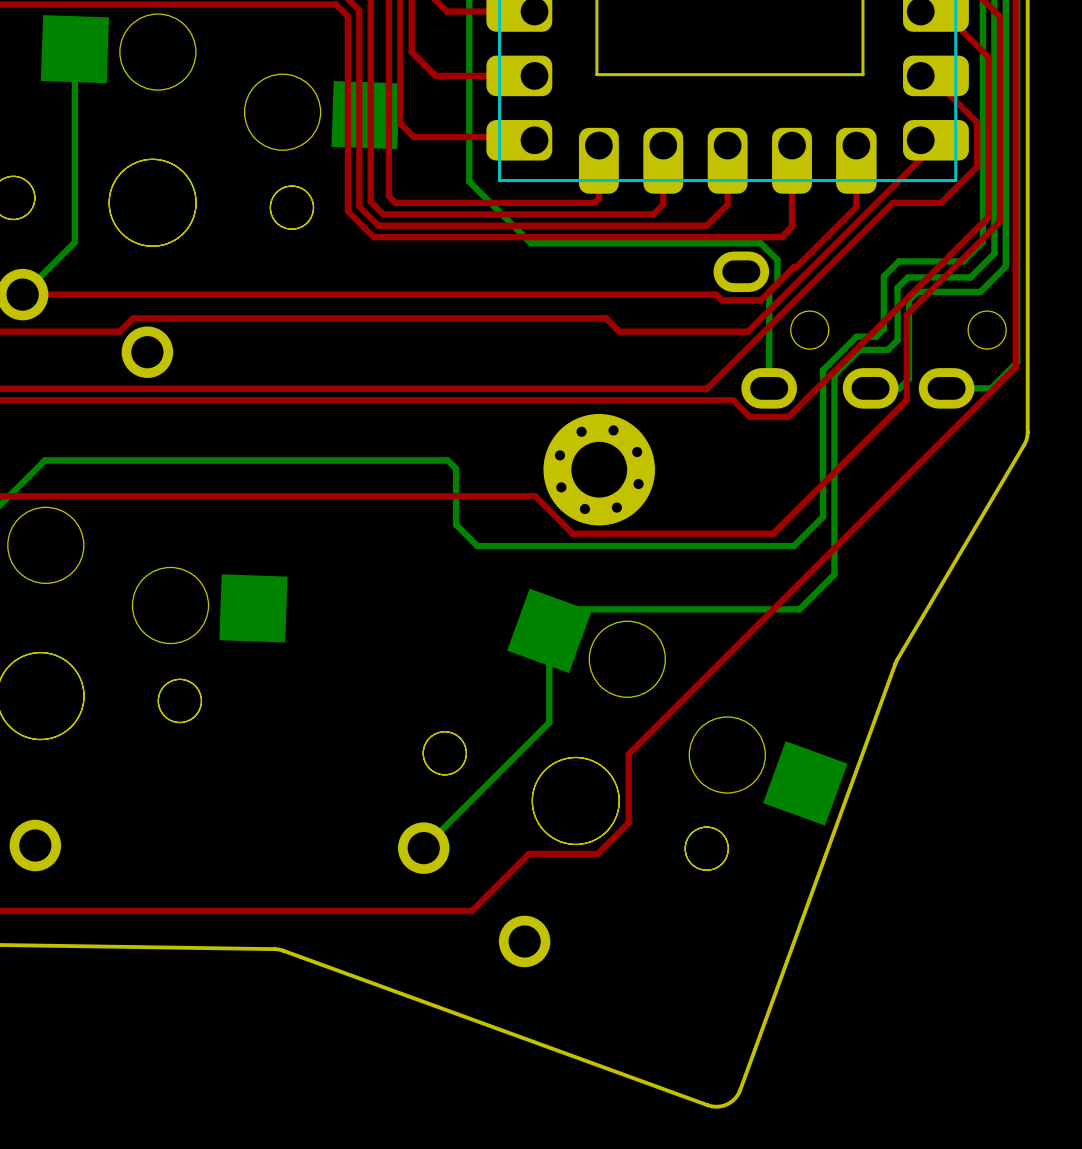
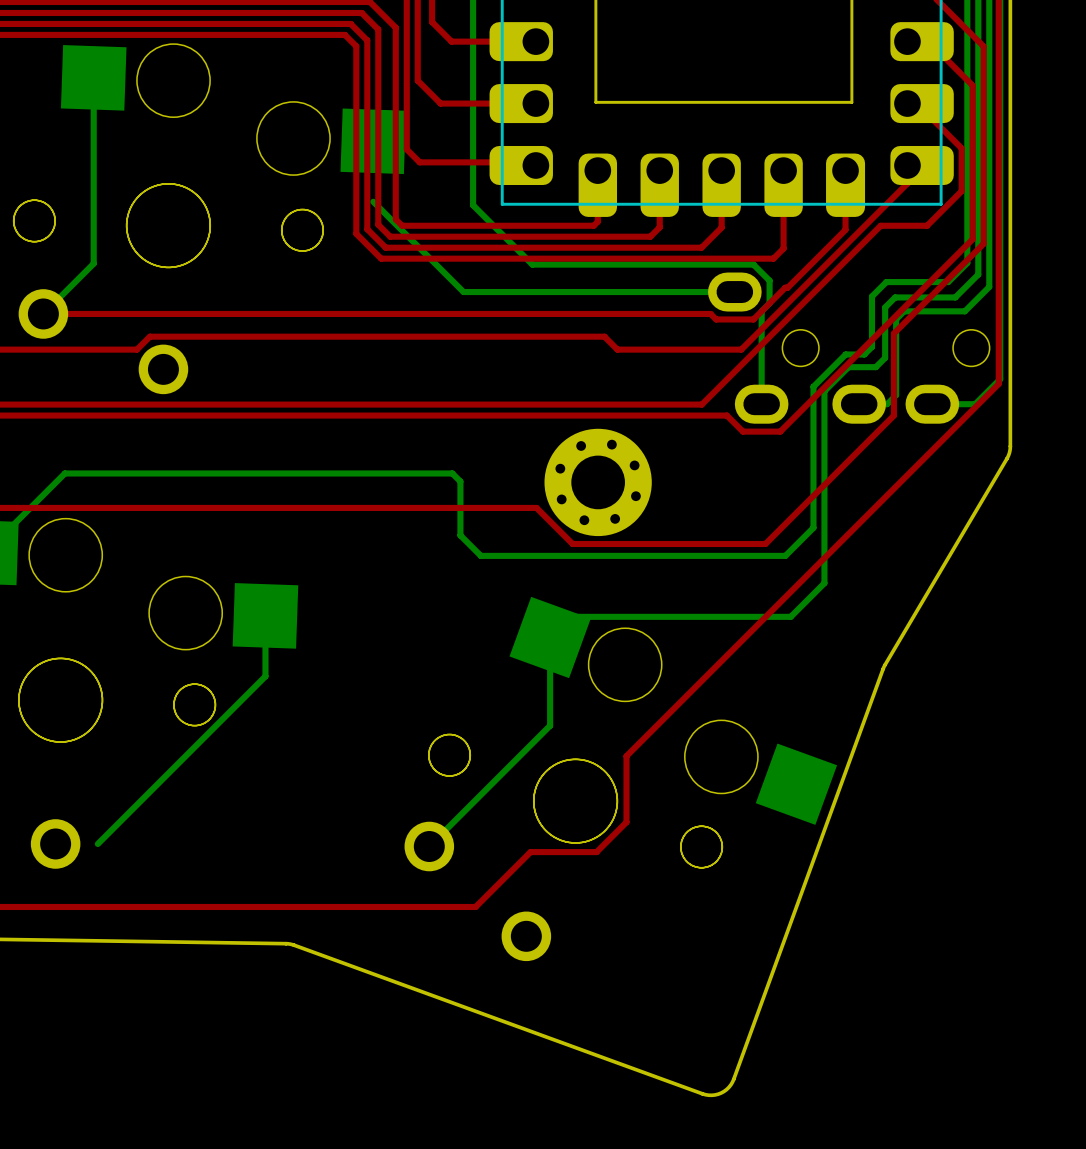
bottom track: none -> (373, 201) (463, 292) (734, 292)
bottom track: none -> (265, 615) (265, 676) (97, 843)

